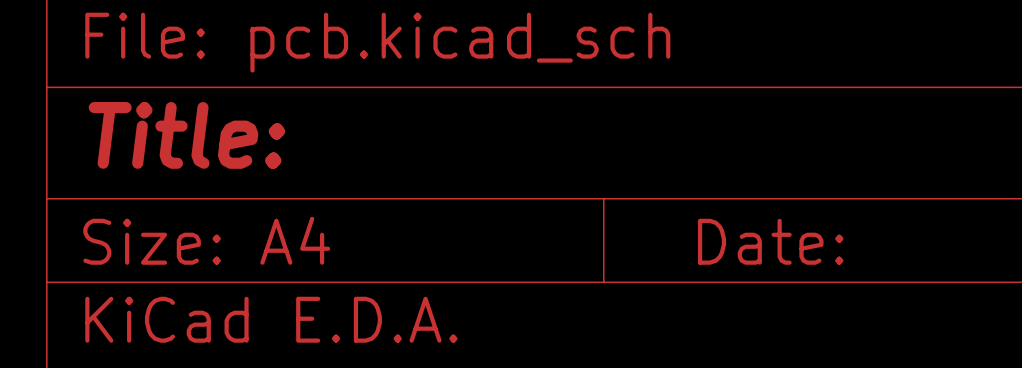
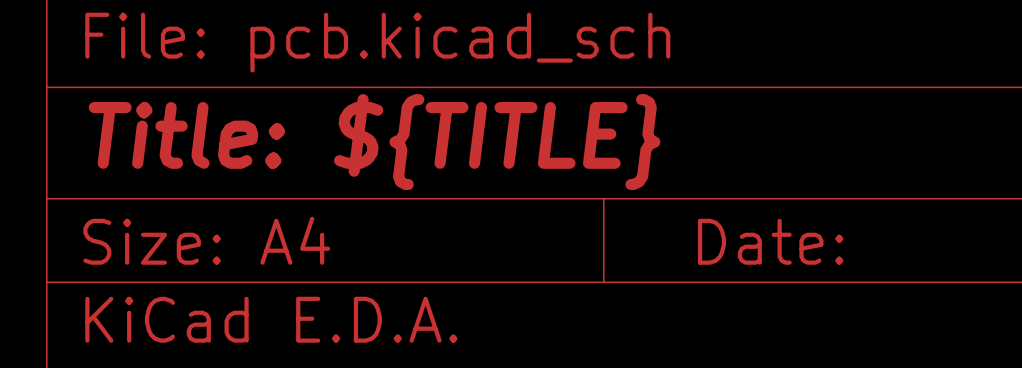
title block: Title: (186, 135) -> Title: ${TITLE} (374, 142)

